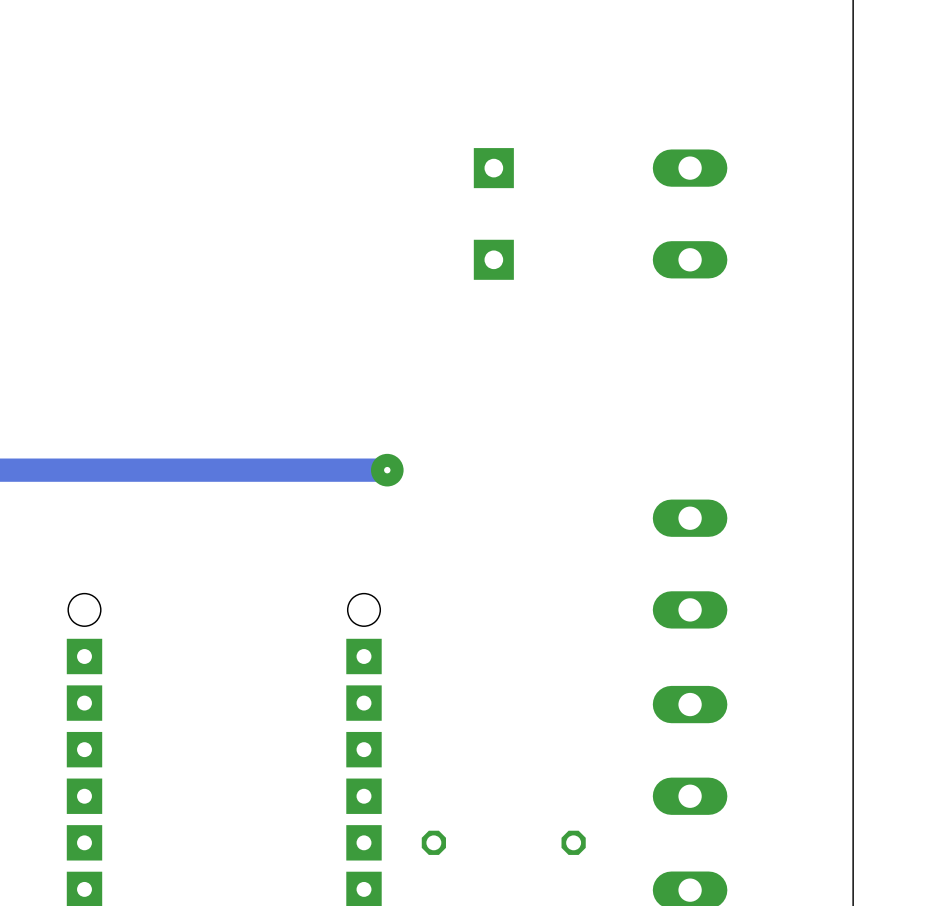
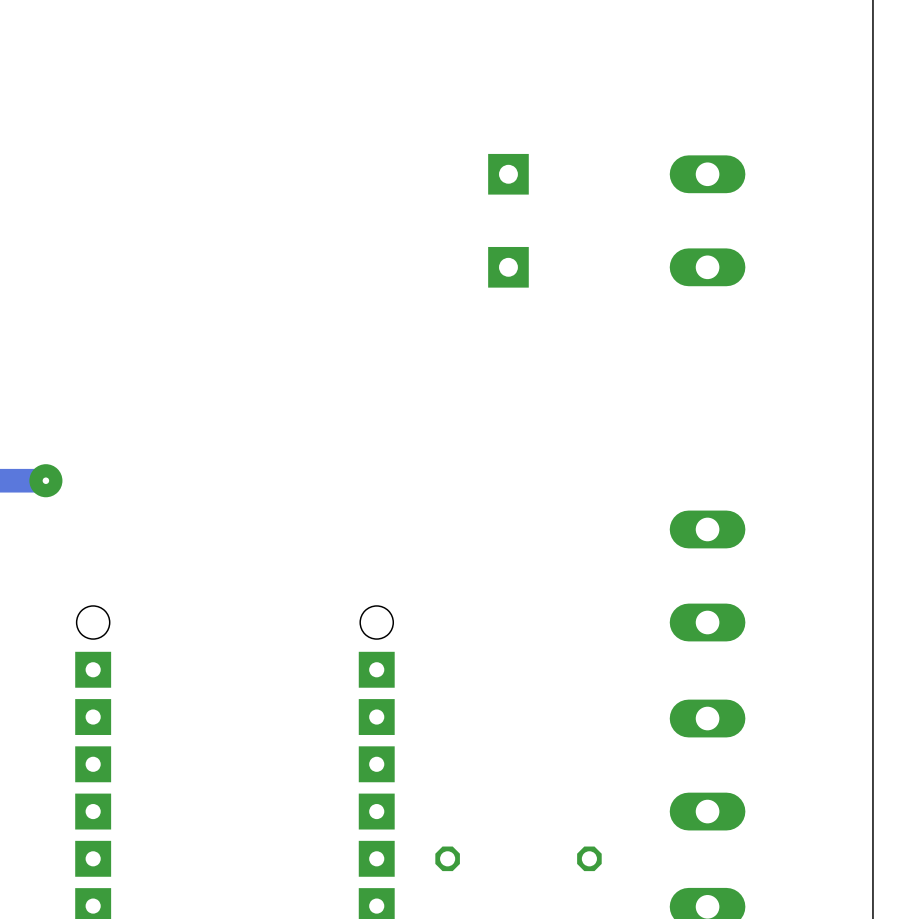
via: none -> (45, 480)
track: (387, 470) (37, 470) -> none
via: (387, 470) -> none

